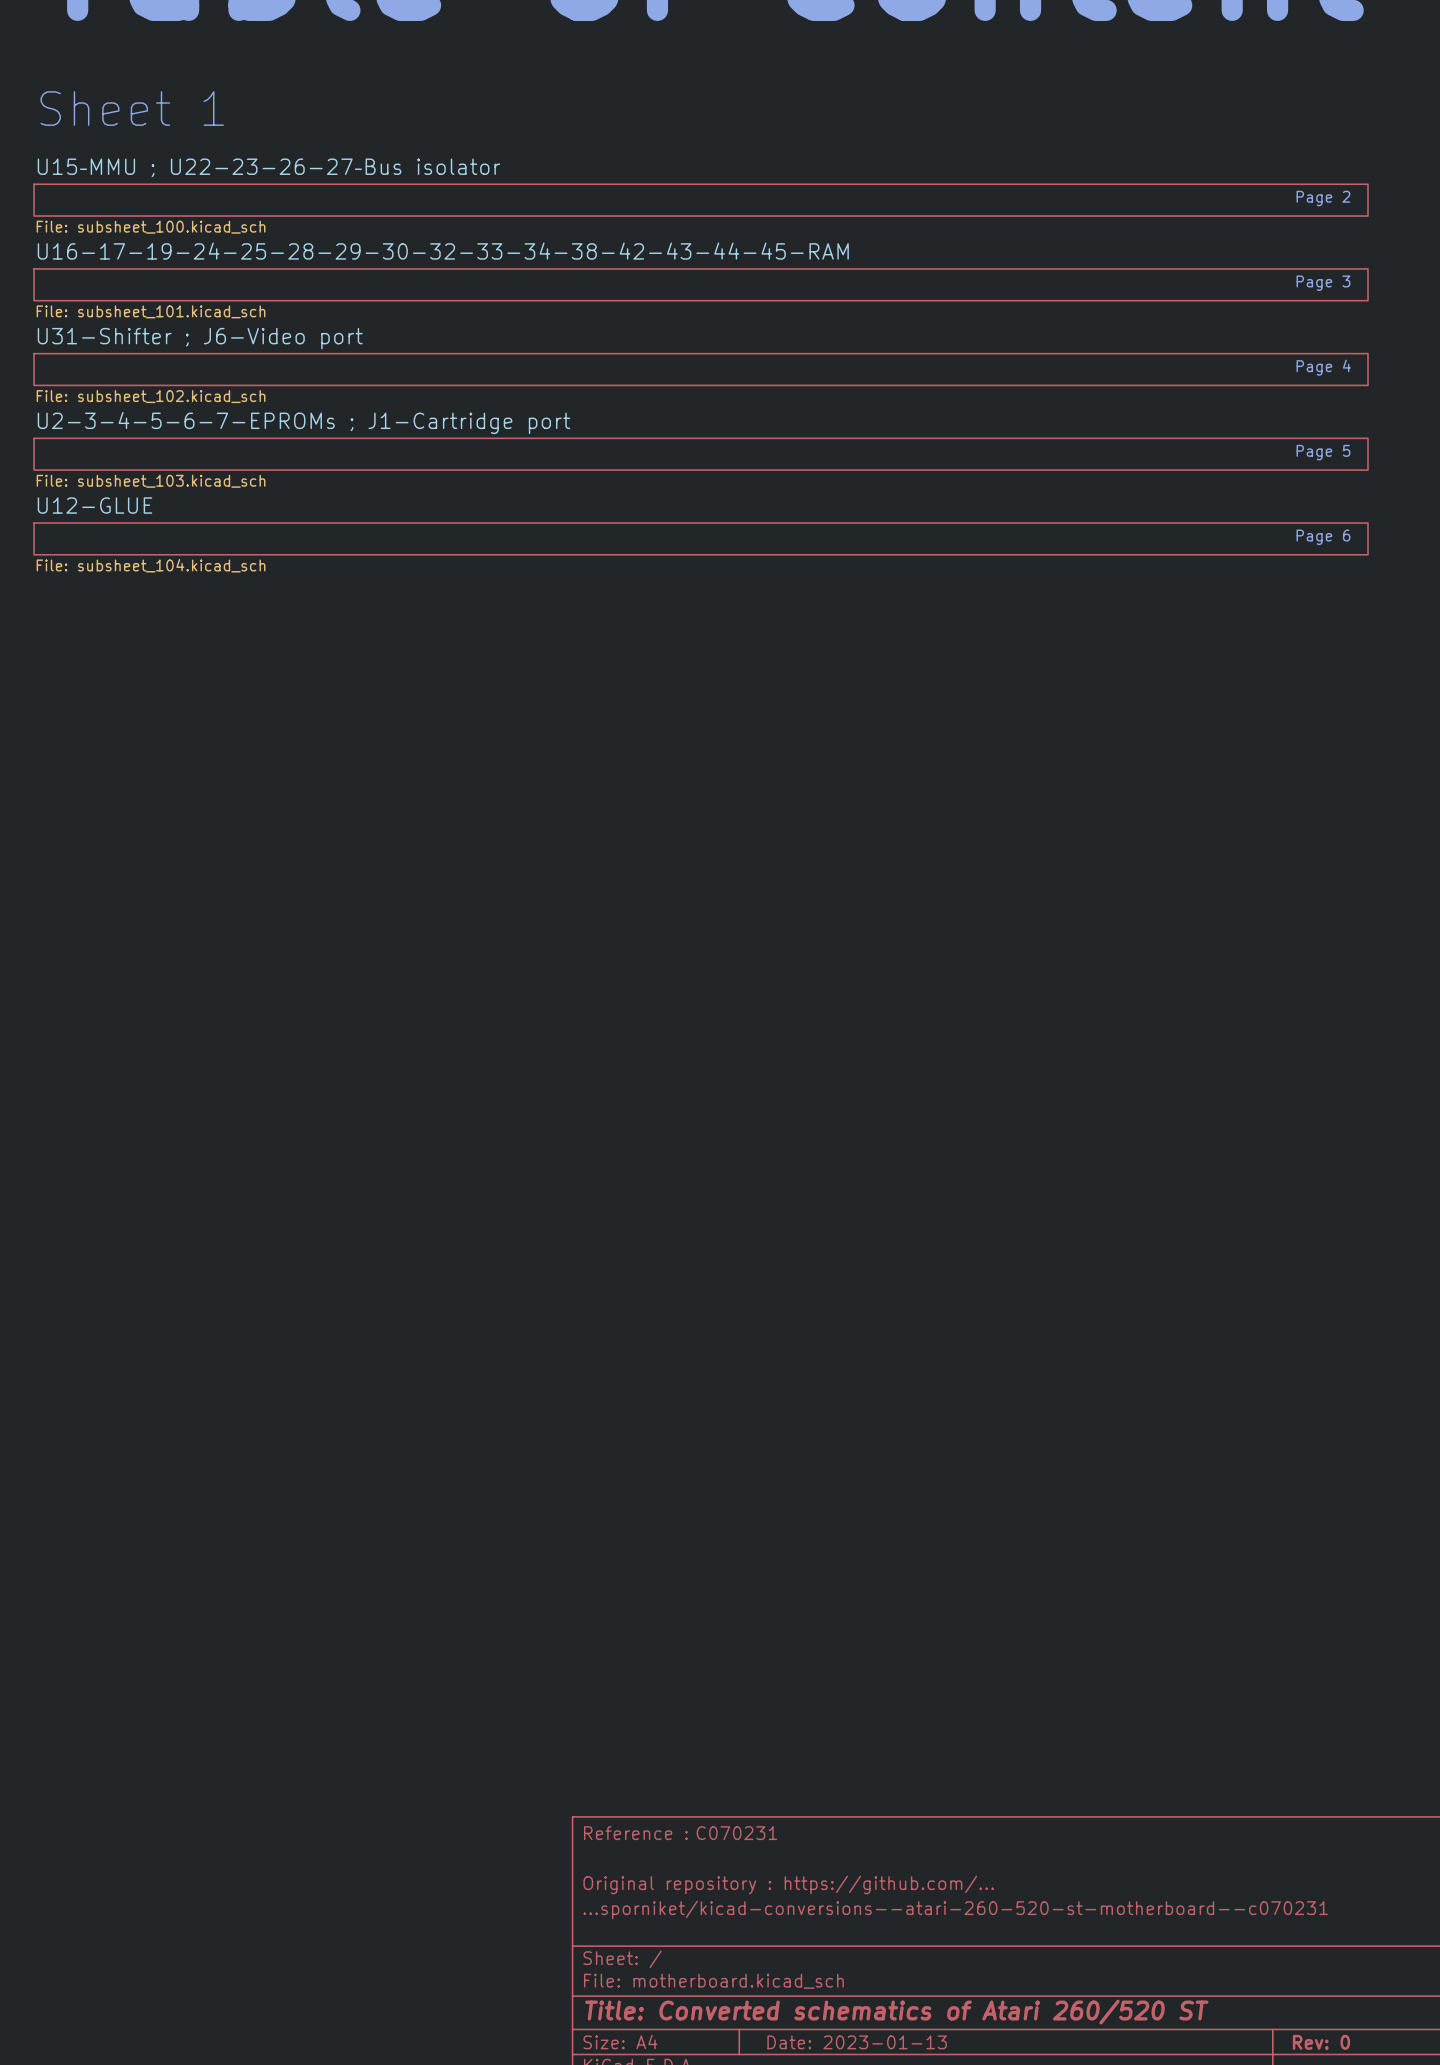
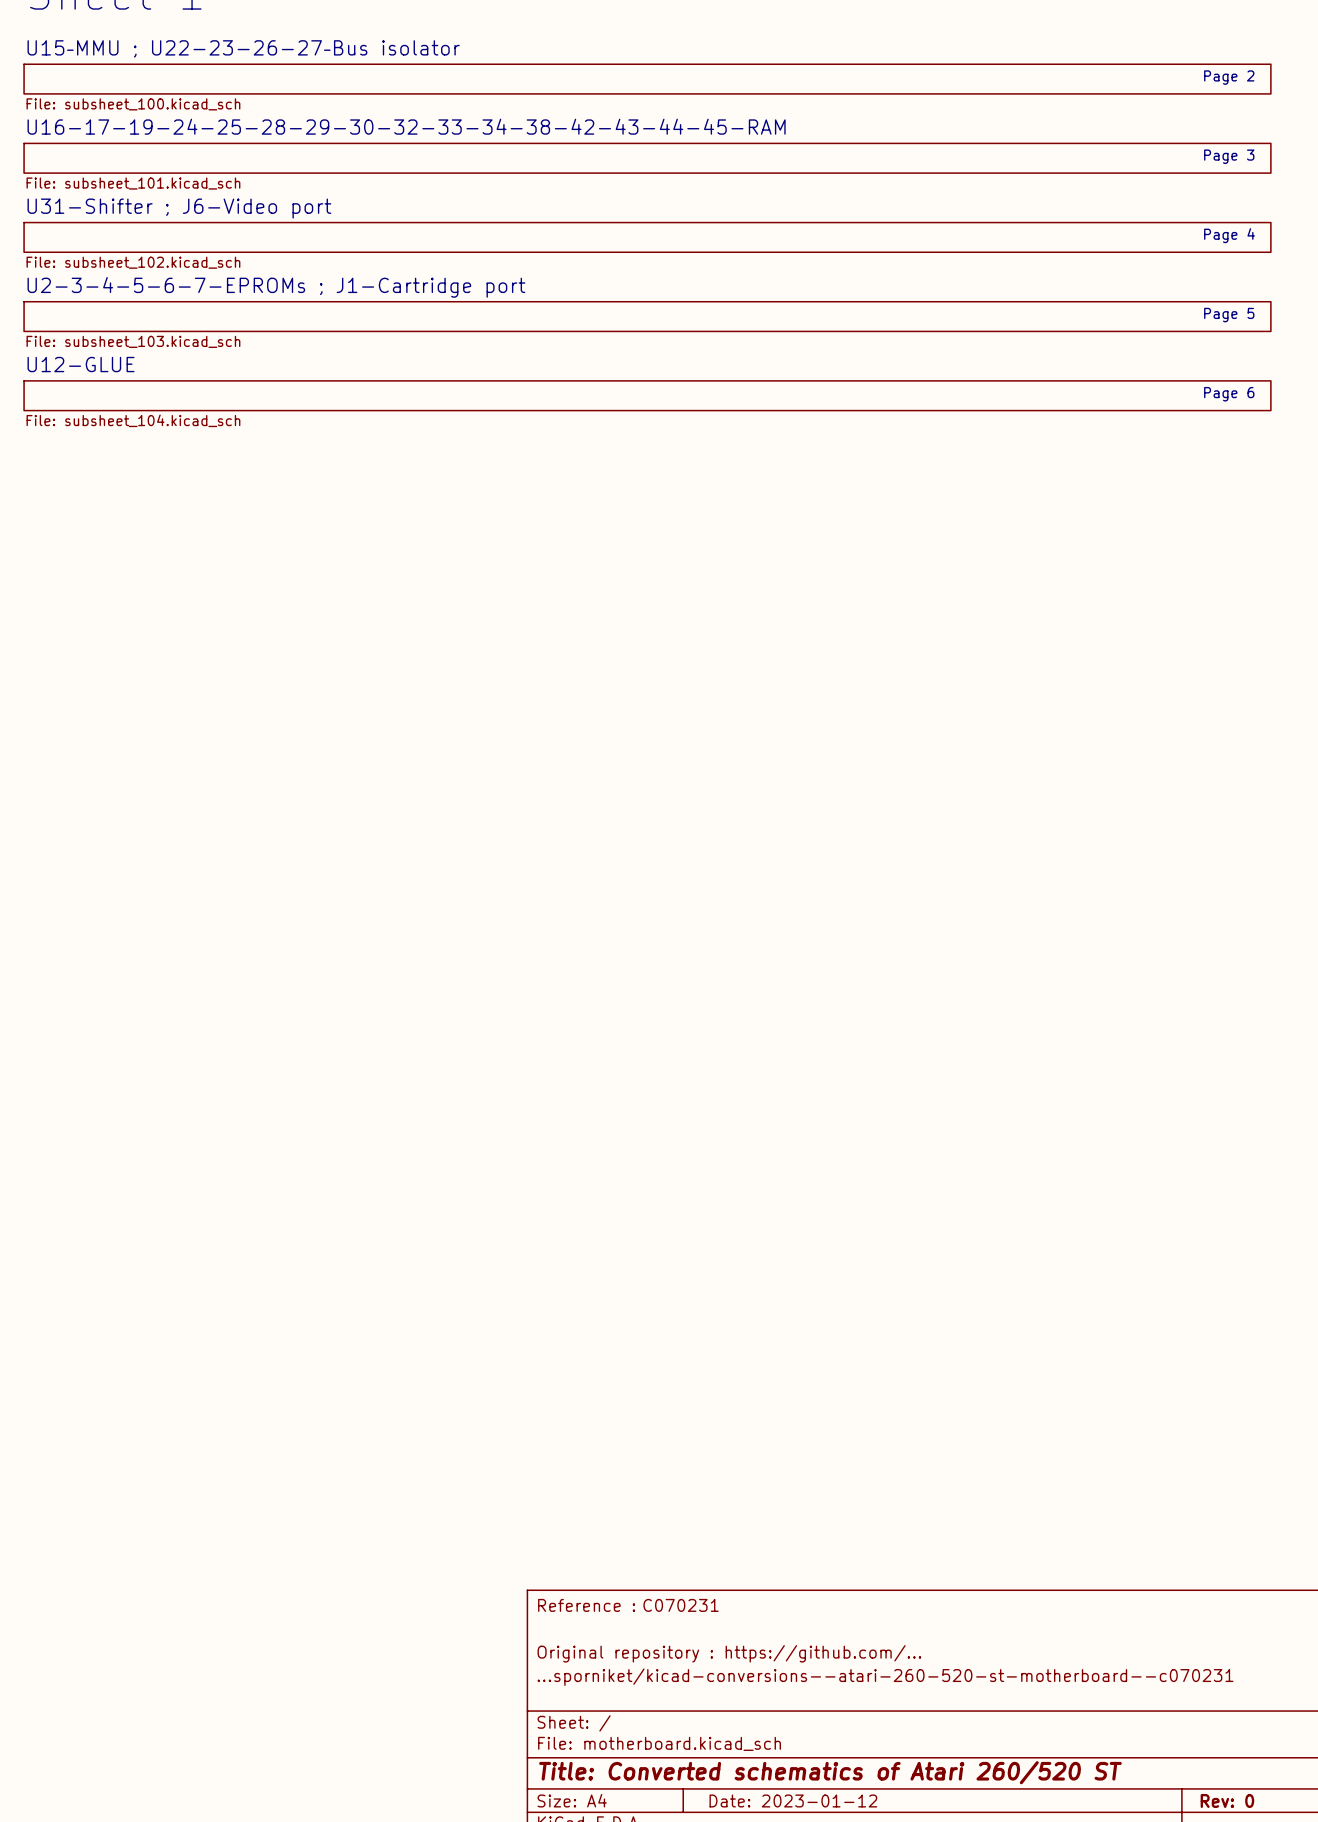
title block: Date: 2023-01-13 (857, 2042) -> Date: 2023-01-12 (793, 1800)

